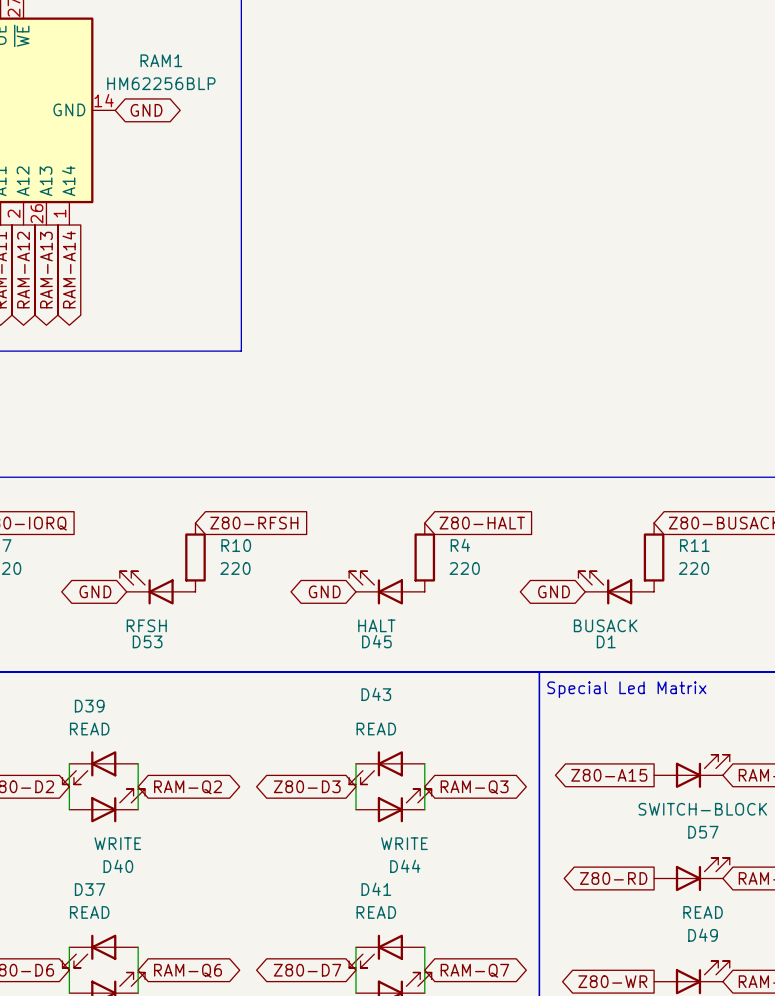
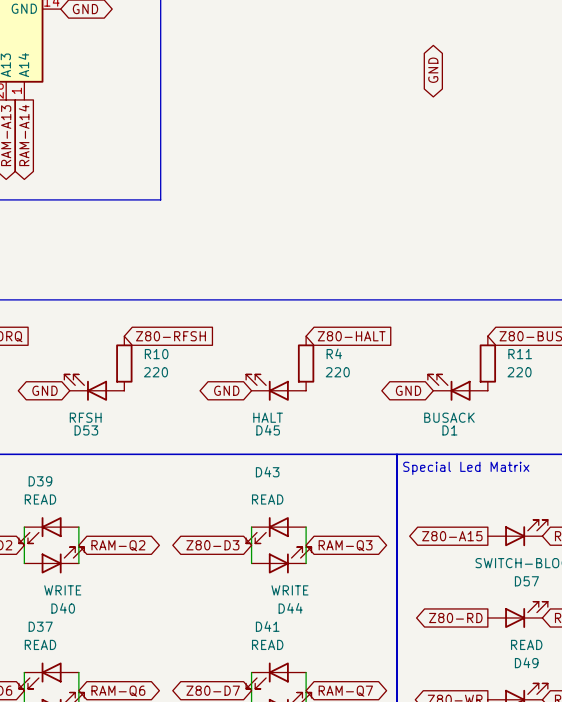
global label: none -> GND (433, 70)

